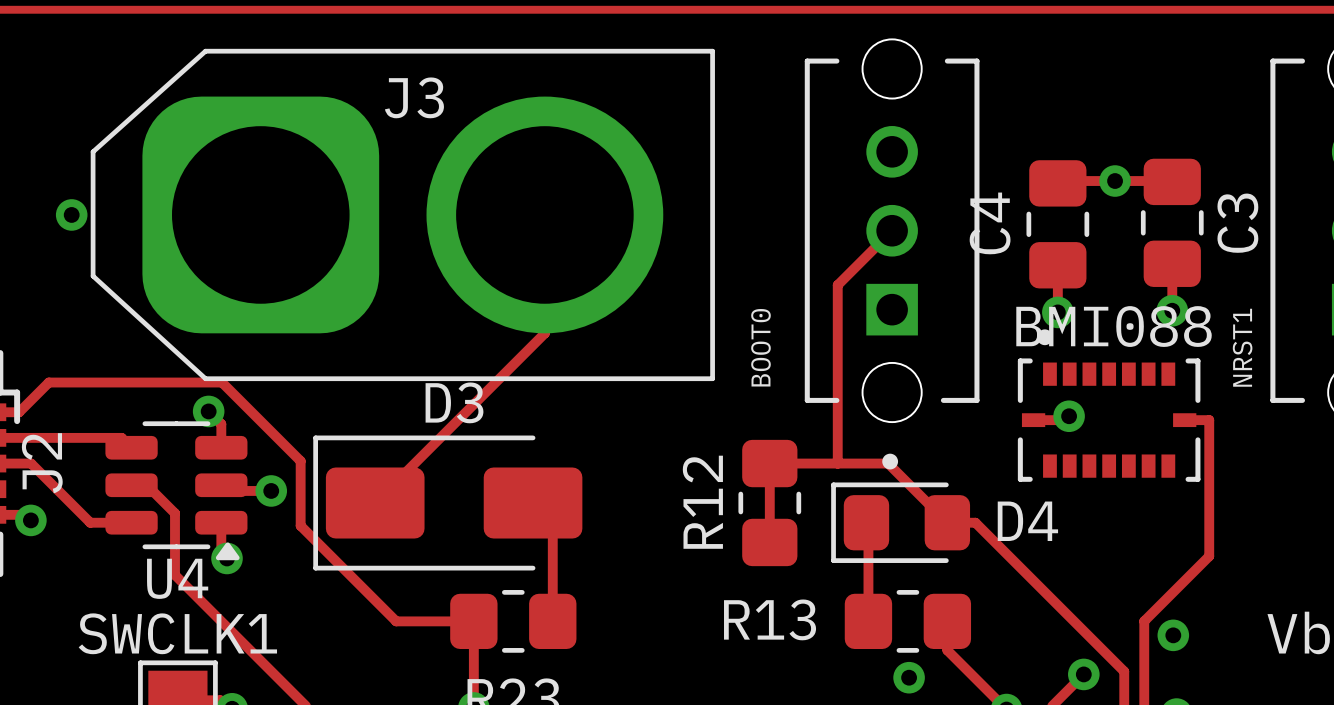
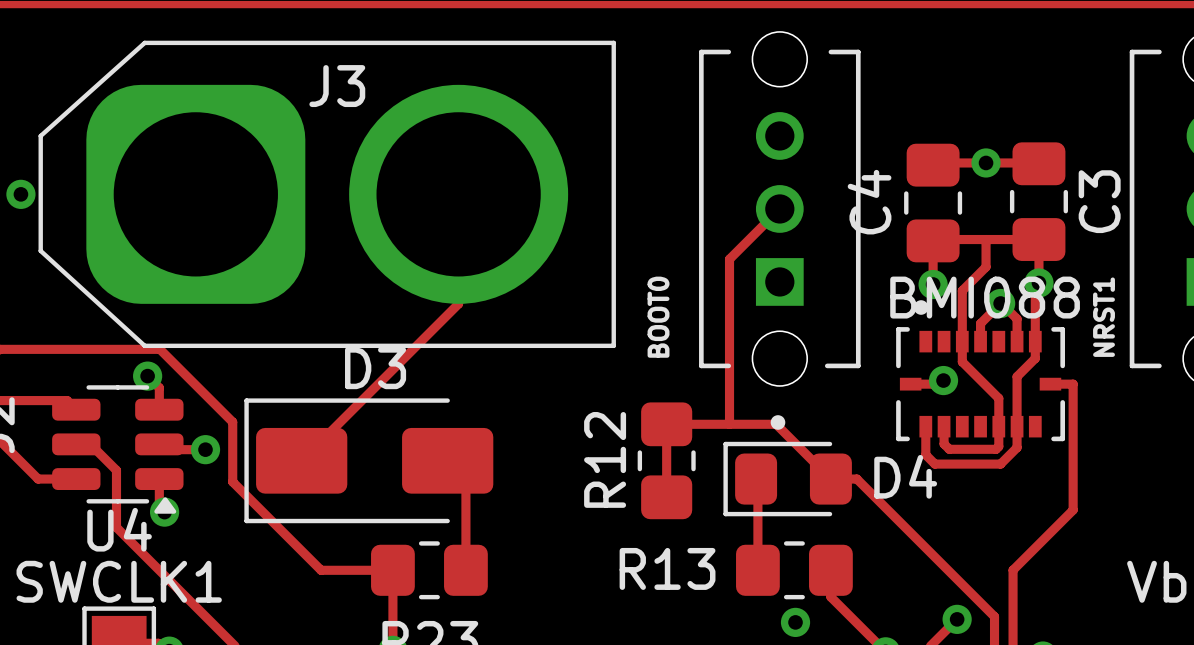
track: none -> (986, 239) (986, 266) (962, 290) (962, 361) (998, 398) (998, 446) (996, 449) (949, 449) (944, 444) (944, 426)
track: none -> (1038, 239) (933, 240)
track: none -> (1038, 282) (1035, 286) (1035, 358) (1017, 376) (1017, 447) (1000, 464) (934, 464) (925, 454) (925, 426)
via: none -> (1000, 303)
track: none -> (980, 341) (980, 323) (1000, 303) (1017, 319) (1017, 341)
via: (1173, 635) -> none

